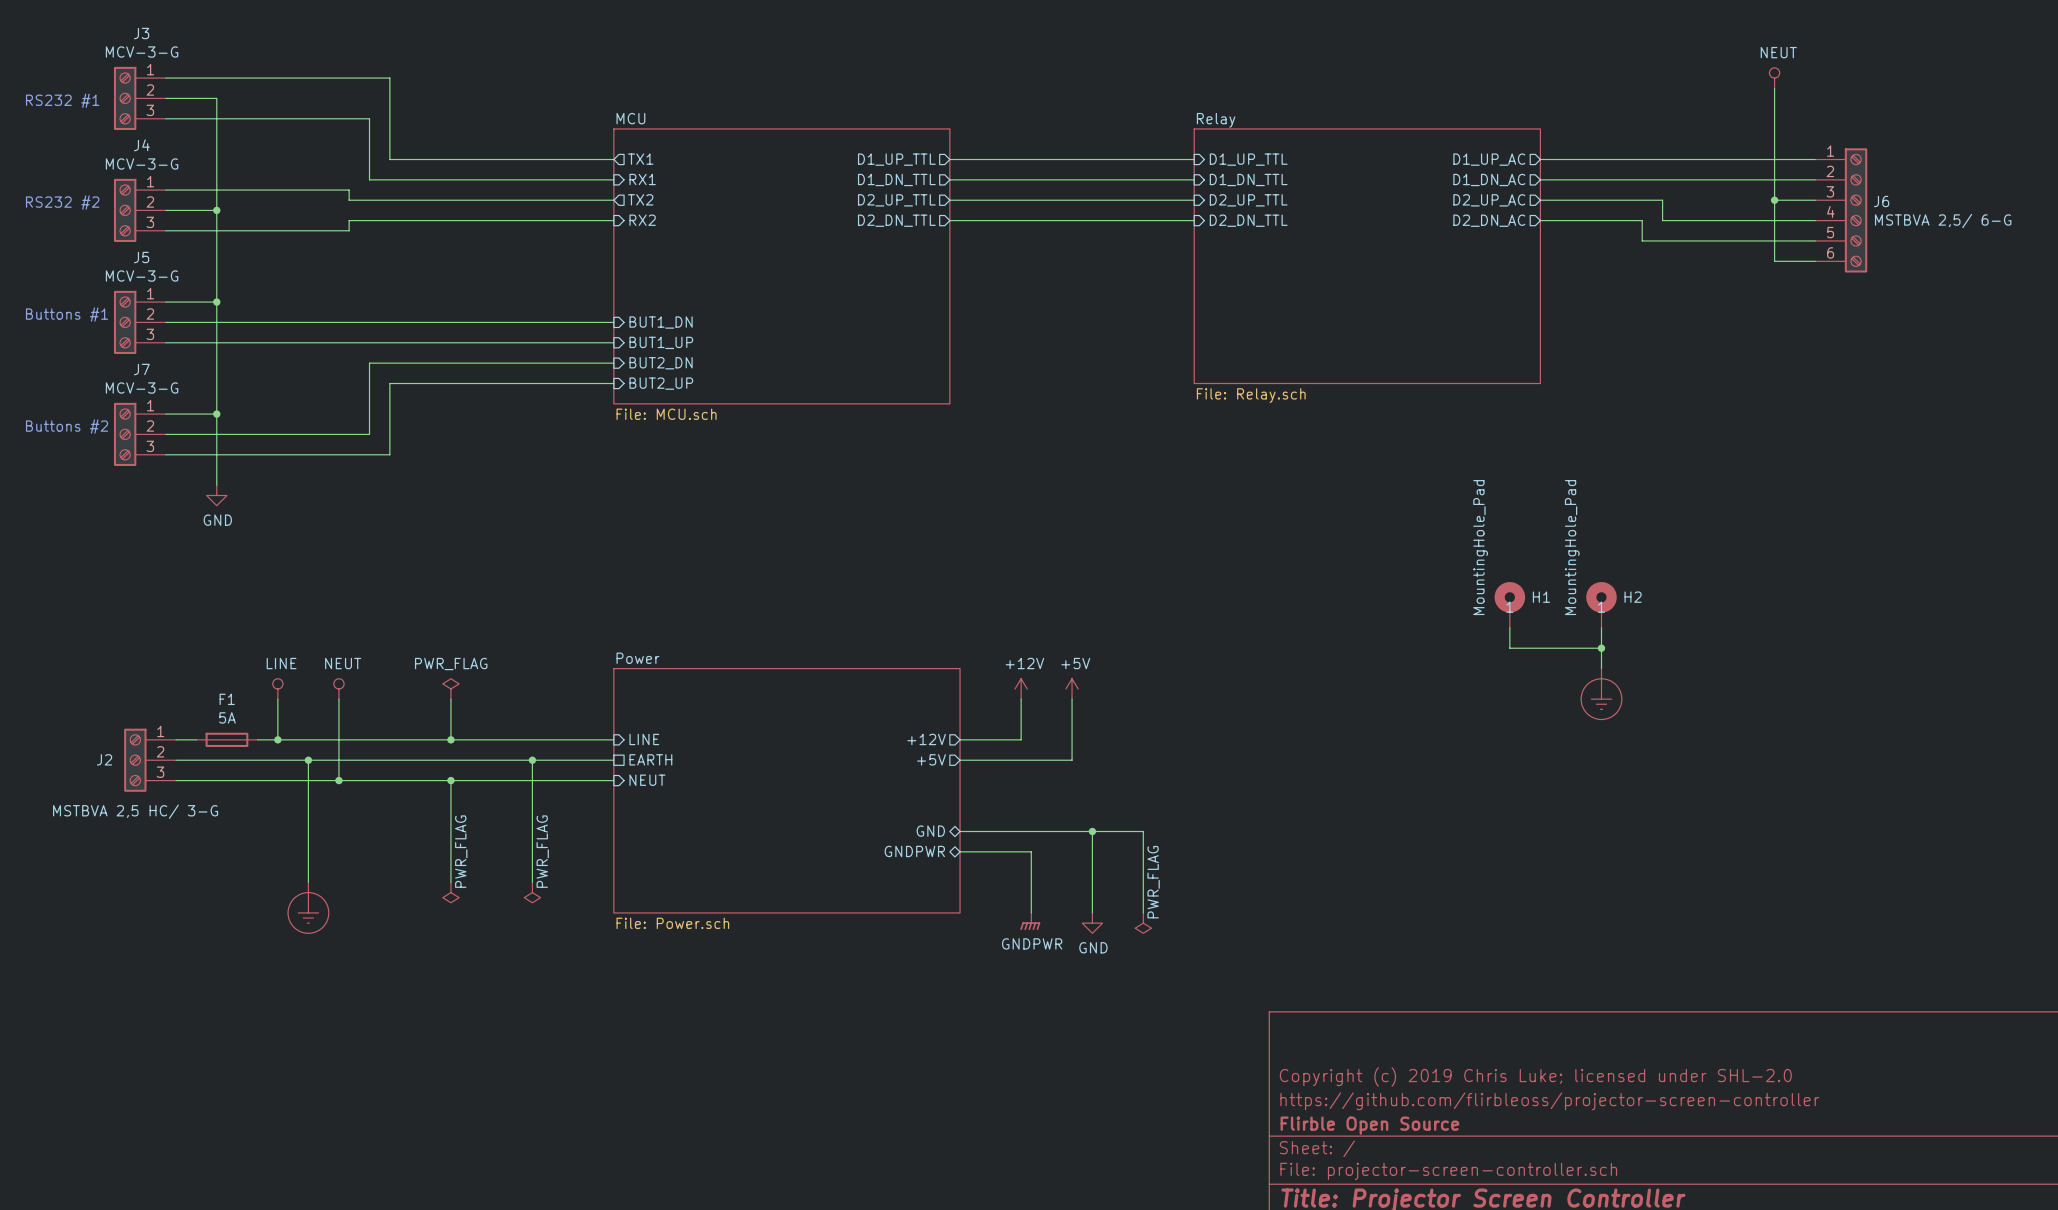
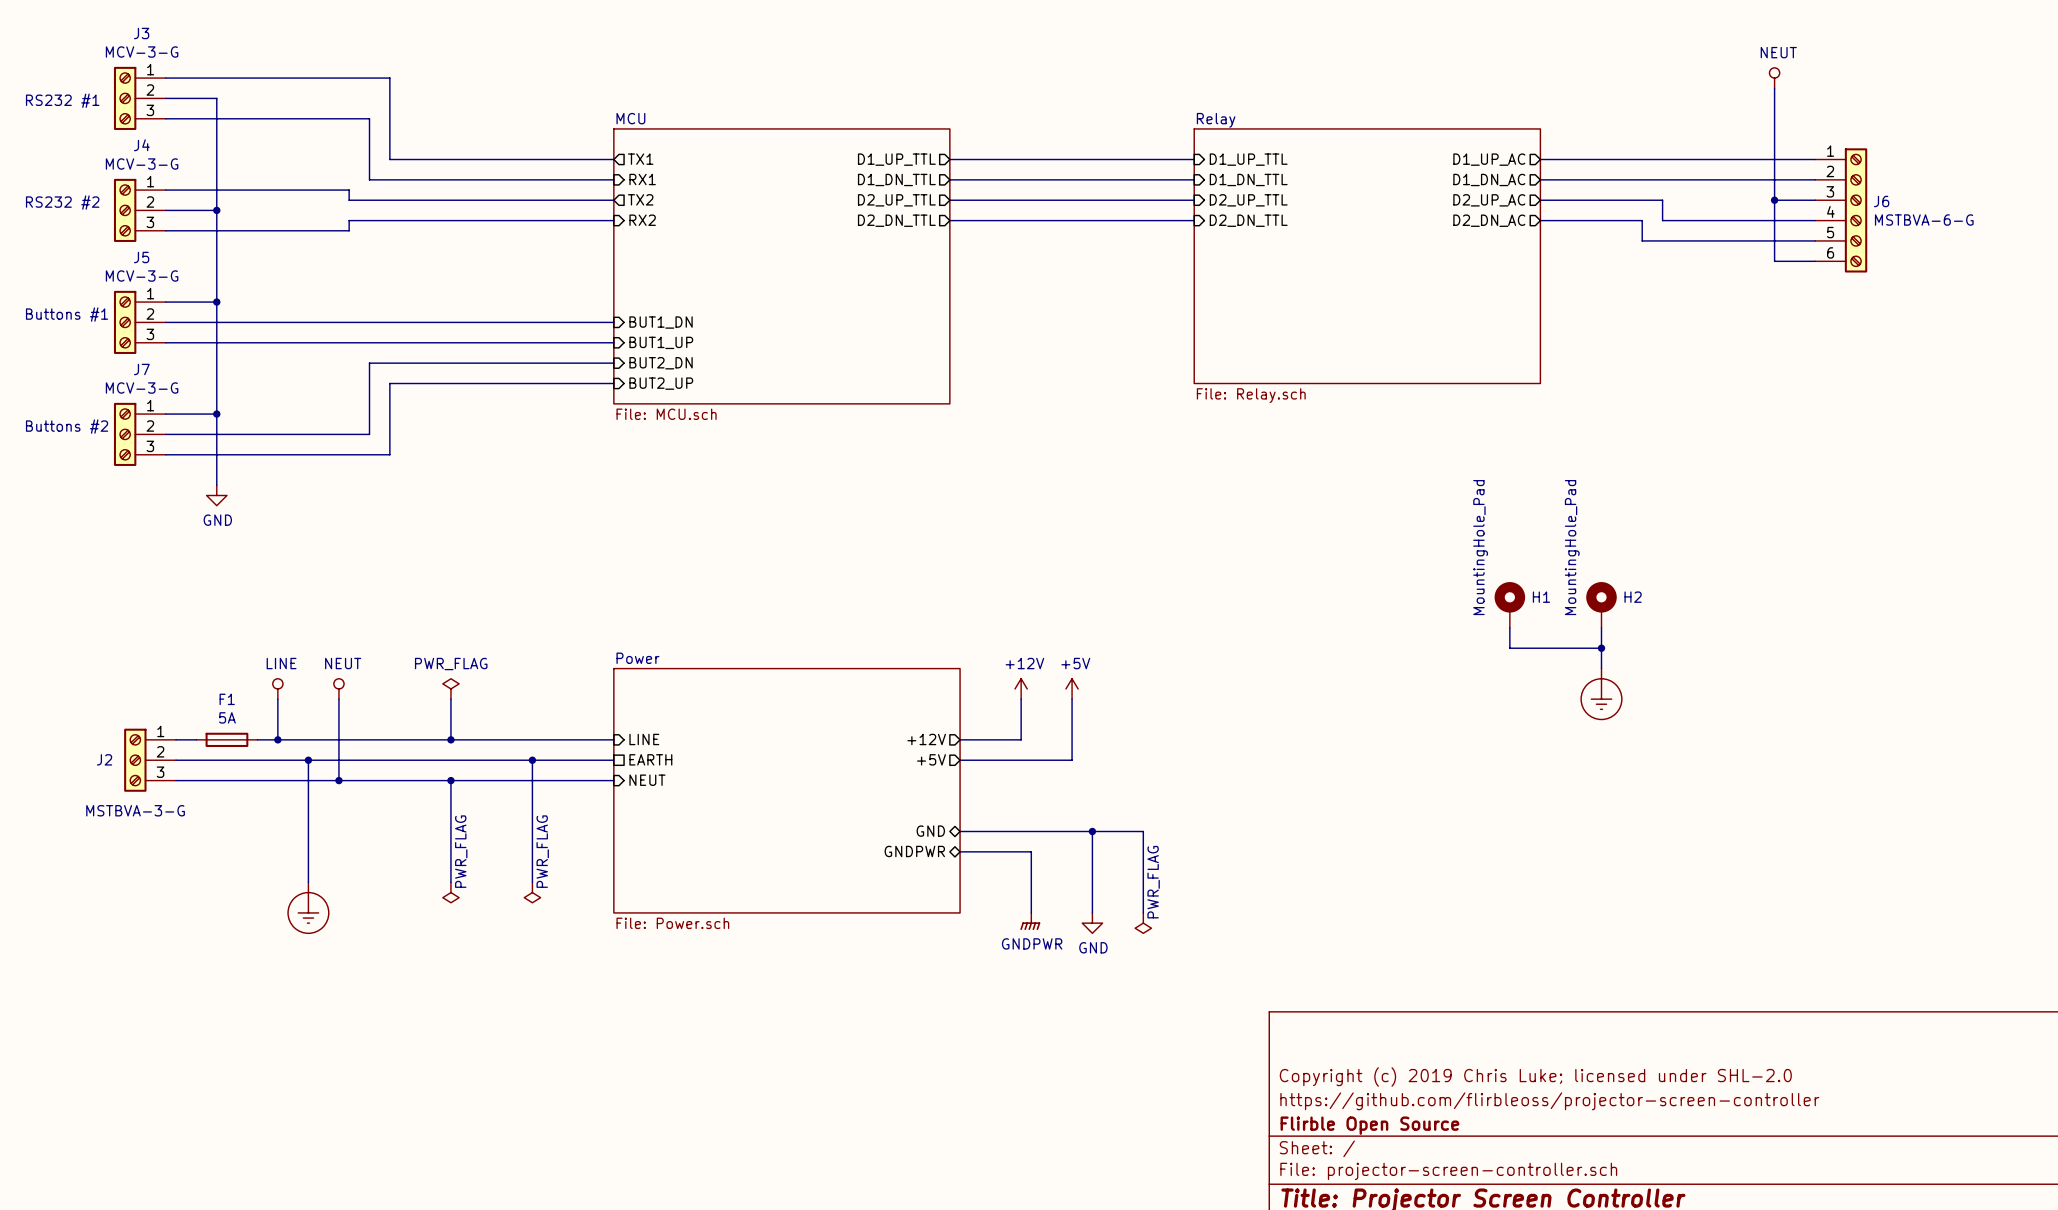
J6 value: MSTBVA 2,5/ 6-G (1943, 220) -> MSTBVA-6-G (1924, 220)
H1 text: 1 (1509, 607) -> none
H2 text: 1 (1601, 607) -> none
J2 value: MSTBVA 2,5 HC/ 3-G (135, 811) -> MSTBVA-3-G (135, 810)

